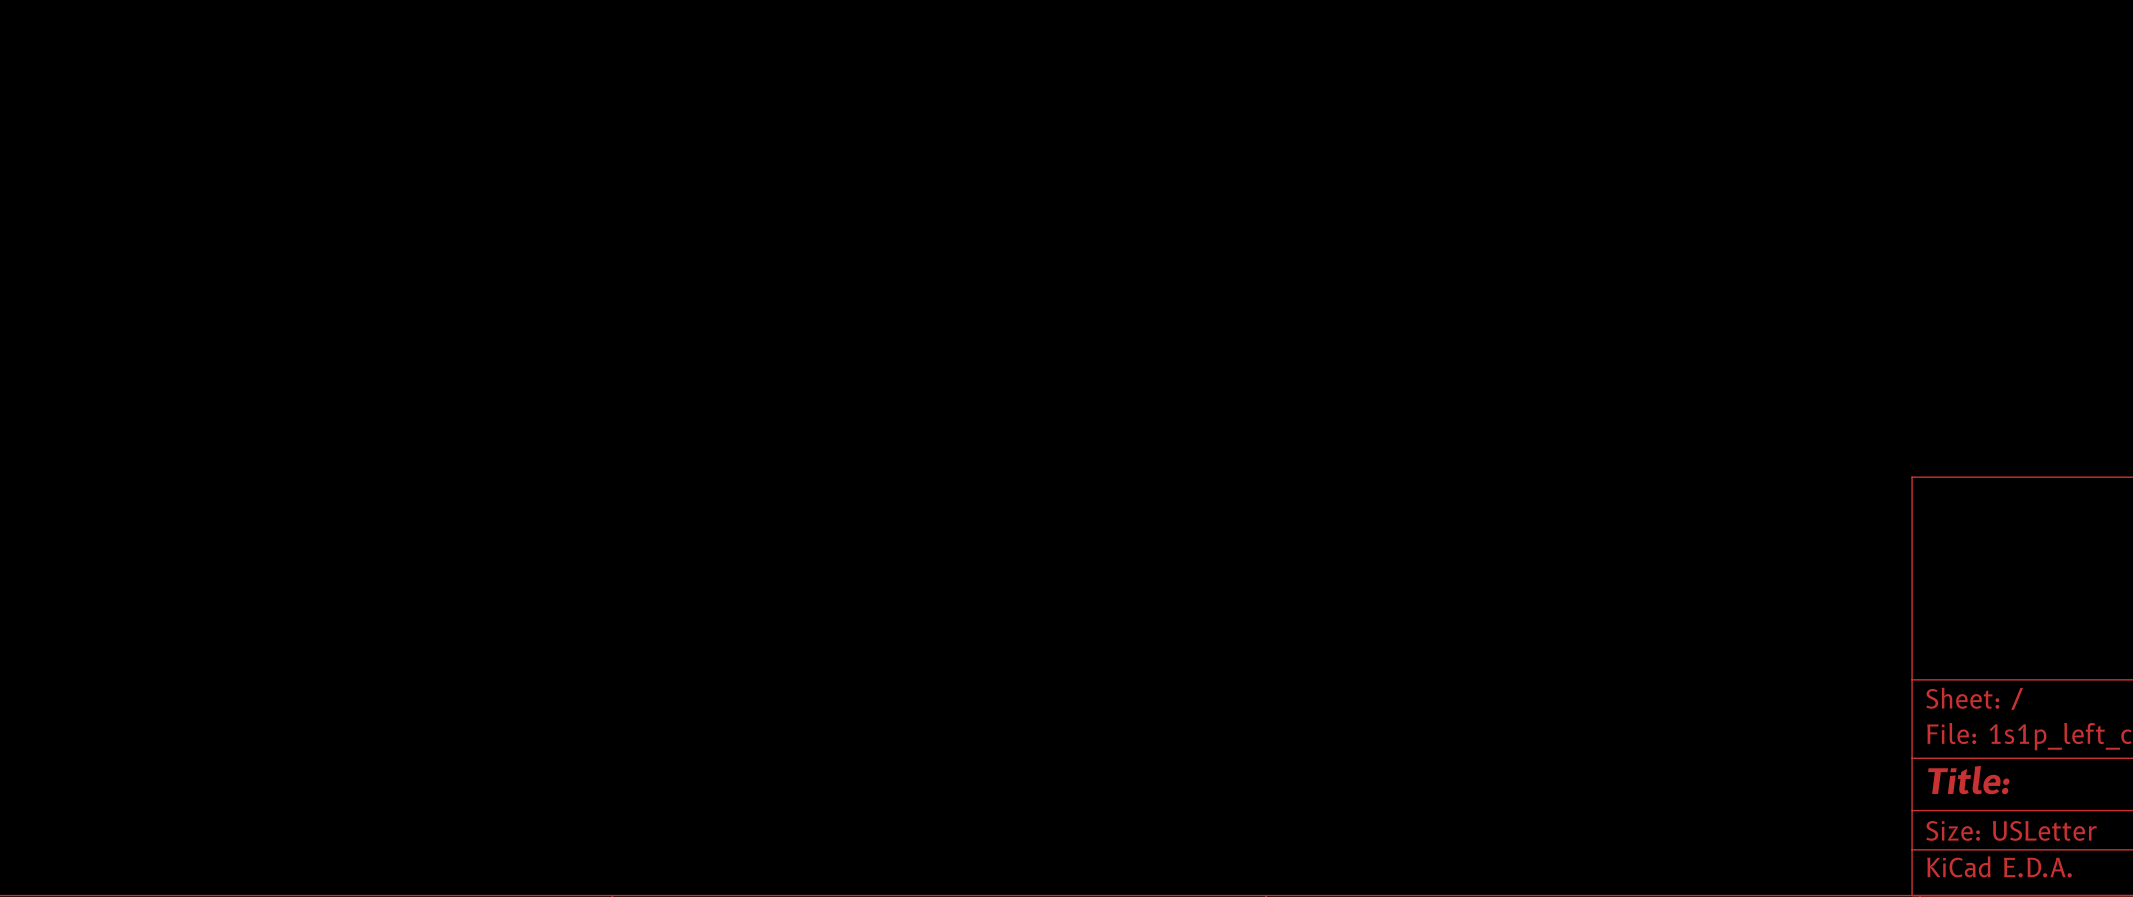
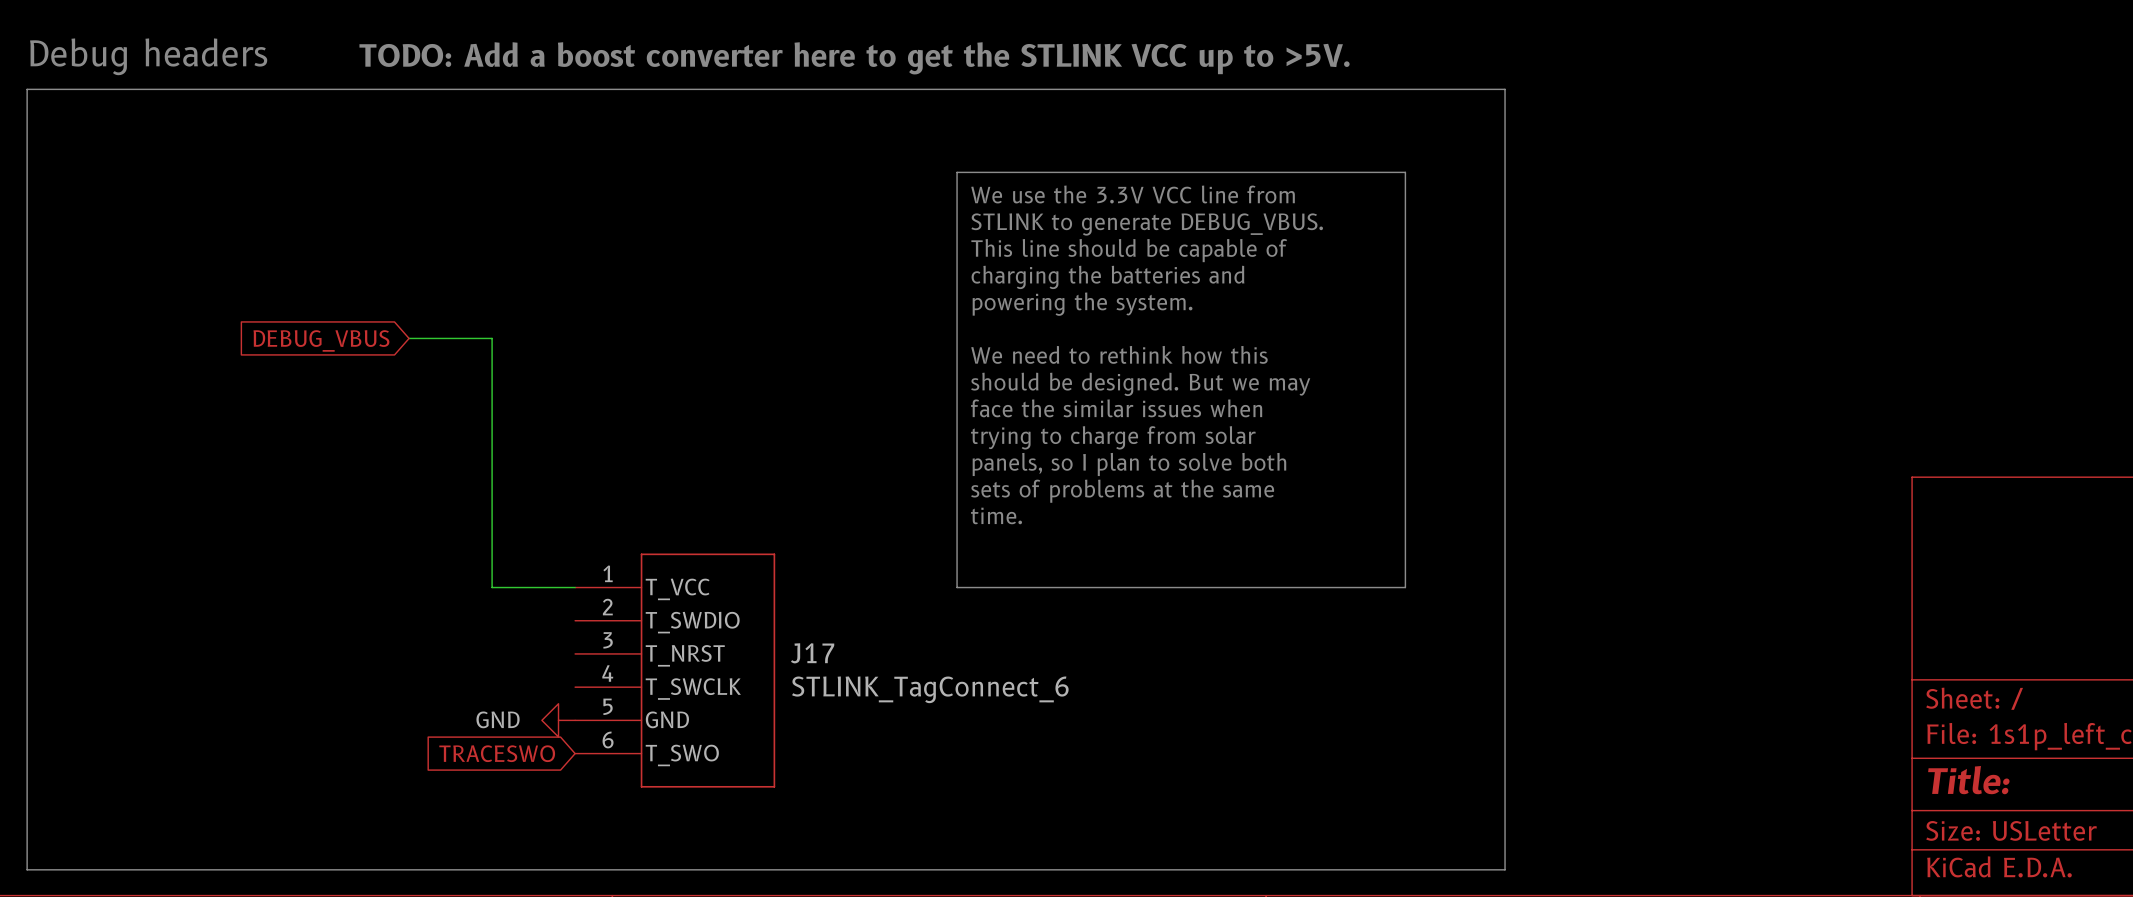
text: none -> Debug headers (148, 56)
text: none -> TODO: Add a boost converter here to get the STLINK VCC up to >5V. (854, 58)
line: none -> (27, 89) (1505, 89) (1505, 869) (27, 869) (27, 89)
line: none -> (957, 172) (1405, 172) (1405, 587) (957, 587) (957, 172)
text: none -> We use the 3.3V VCC line from (1133, 194)
text: none -> STLINK to generate DEBUG_VBUS. (1147, 224)
text: none -> This line should be capable of (1129, 250)
text: none -> charging the batteries and (1107, 277)
text: none -> powering the system. (1082, 304)
wire: none -> (409, 338) (492, 338) (492, 587) (575, 587)
global label: none -> DEBUG_VBUS (321, 340)
text: none -> We need to rethink how this (1119, 354)
text: none -> should be designed. But we may (1140, 384)
text: none -> face the similar issues when (1116, 408)
text: none -> trying to charge from solar (1113, 437)
text: none -> panels, so I plan to solve both (1129, 464)
text: none -> sets of problems at the same (1122, 491)
text: none -> time. (996, 515)
J17: none -> STLINK_TagConnect_6 (675, 670)
power symbol: none -> GND (558, 720)
global label: none -> TRACESWO (497, 753)

